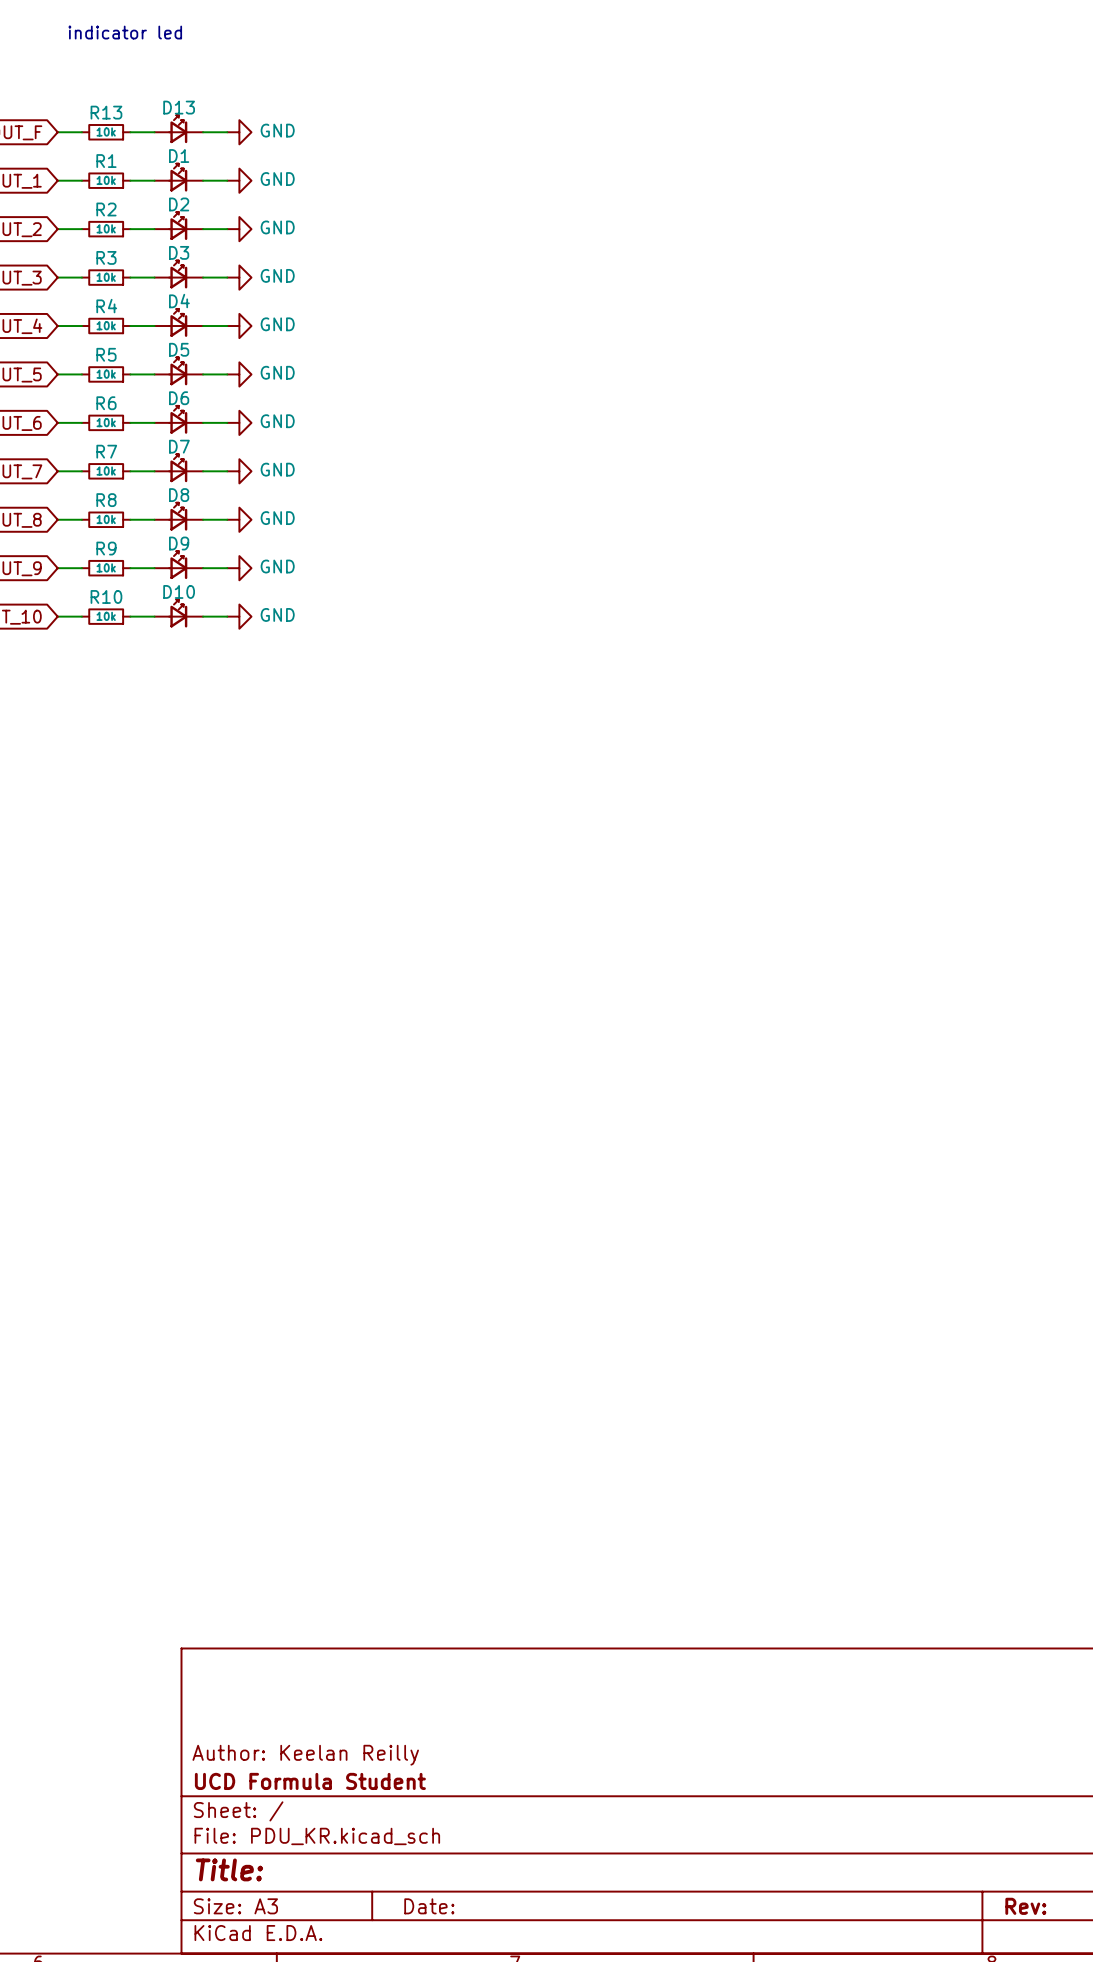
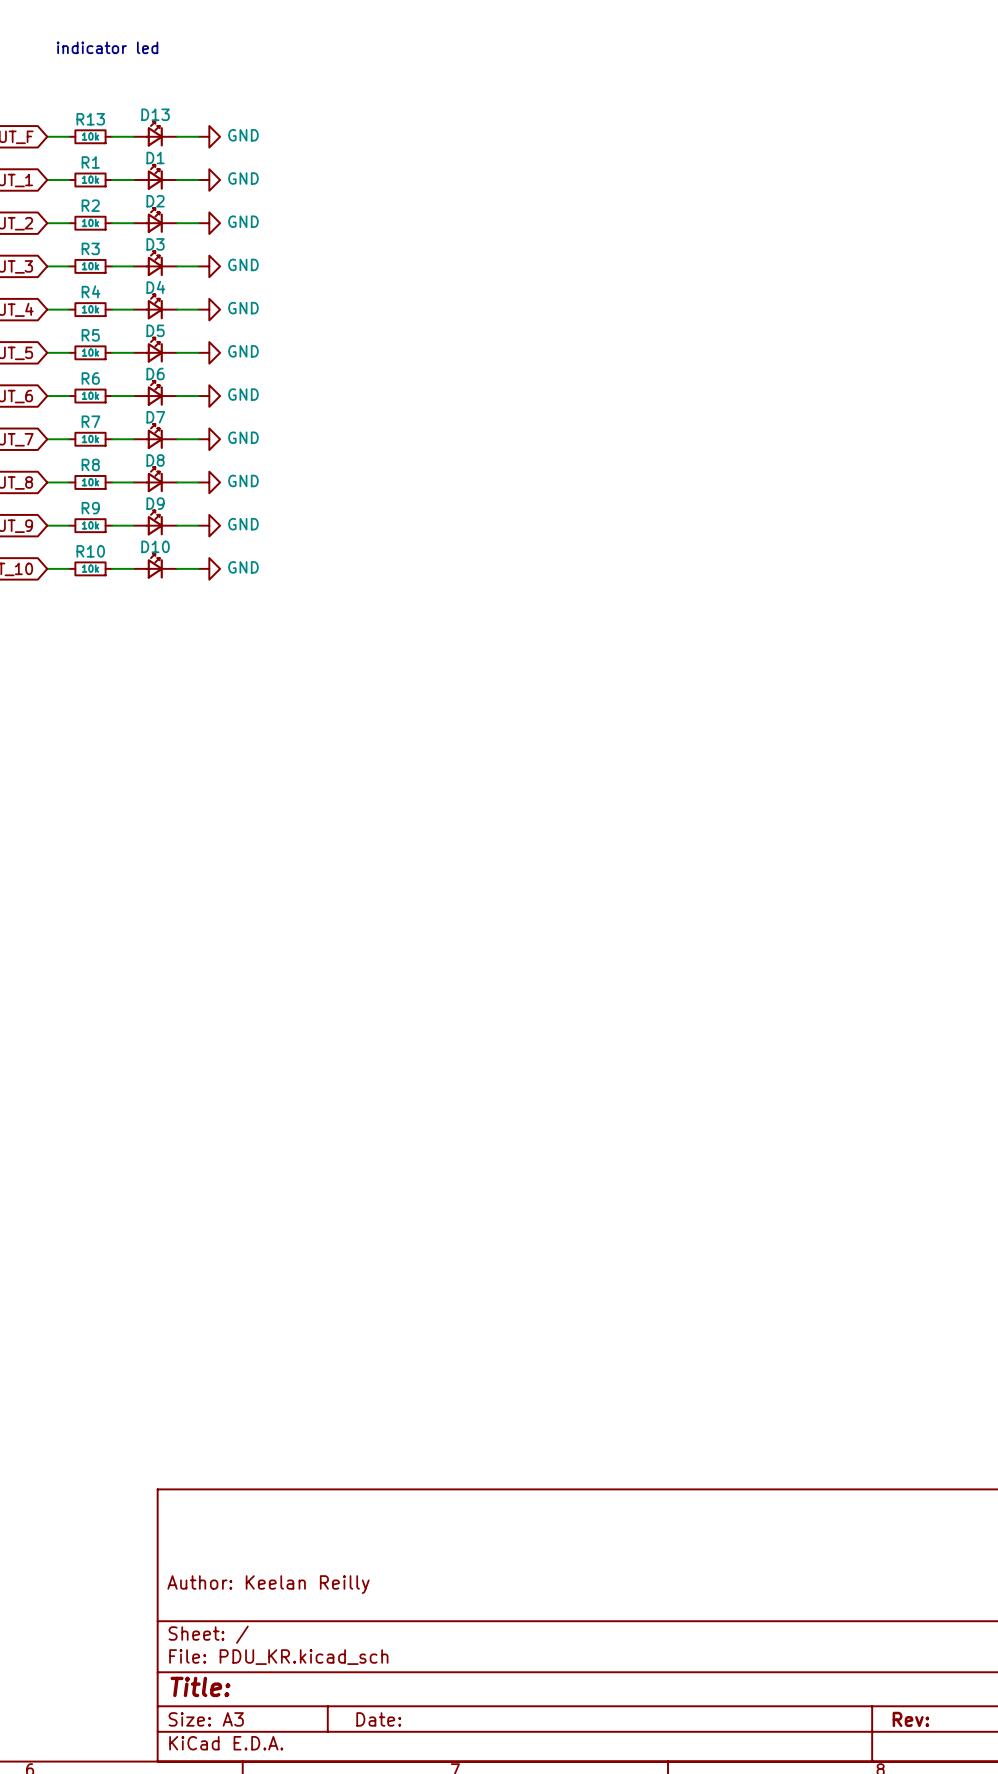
title block: UCD Formula Student (310, 1781) -> none

